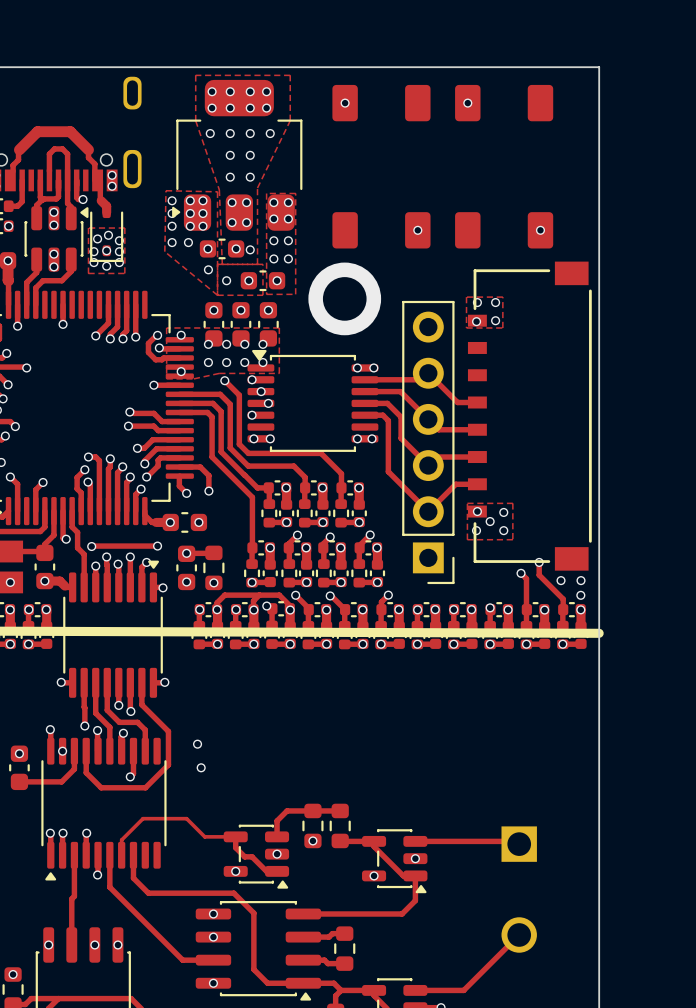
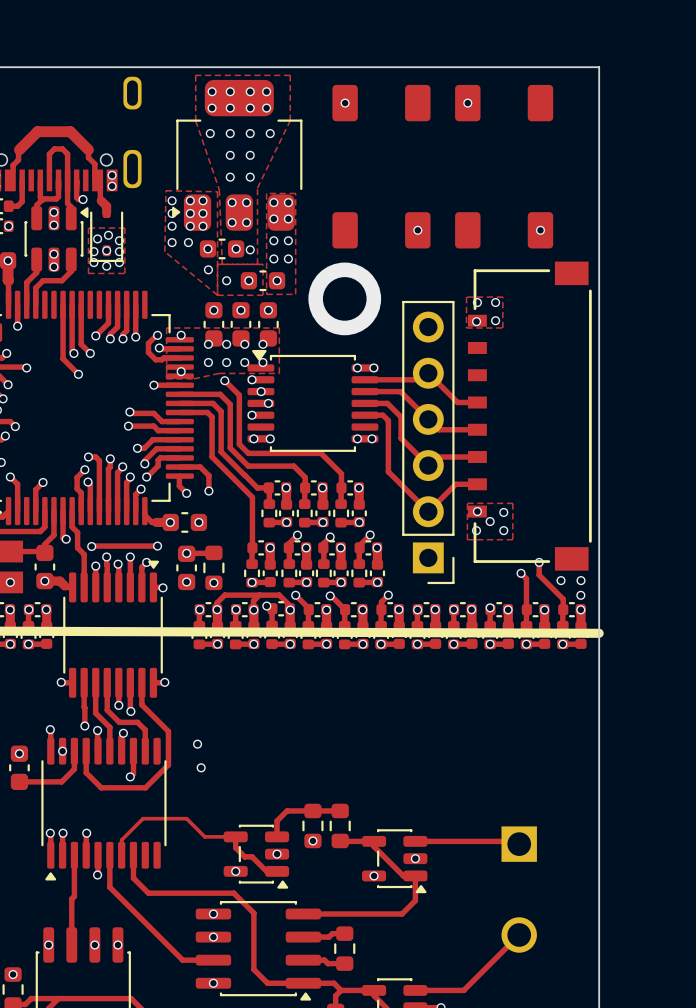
track: none -> (72, 304) (72, 351) (73, 353)
track: none -> (81, 304) (81, 344) (90, 353)
track: none -> (63, 324) (63, 358) (78, 374)
via: (63, 324) -> none
via: none -> (73, 353)
via: none -> (90, 353)
via: none -> (78, 374)

